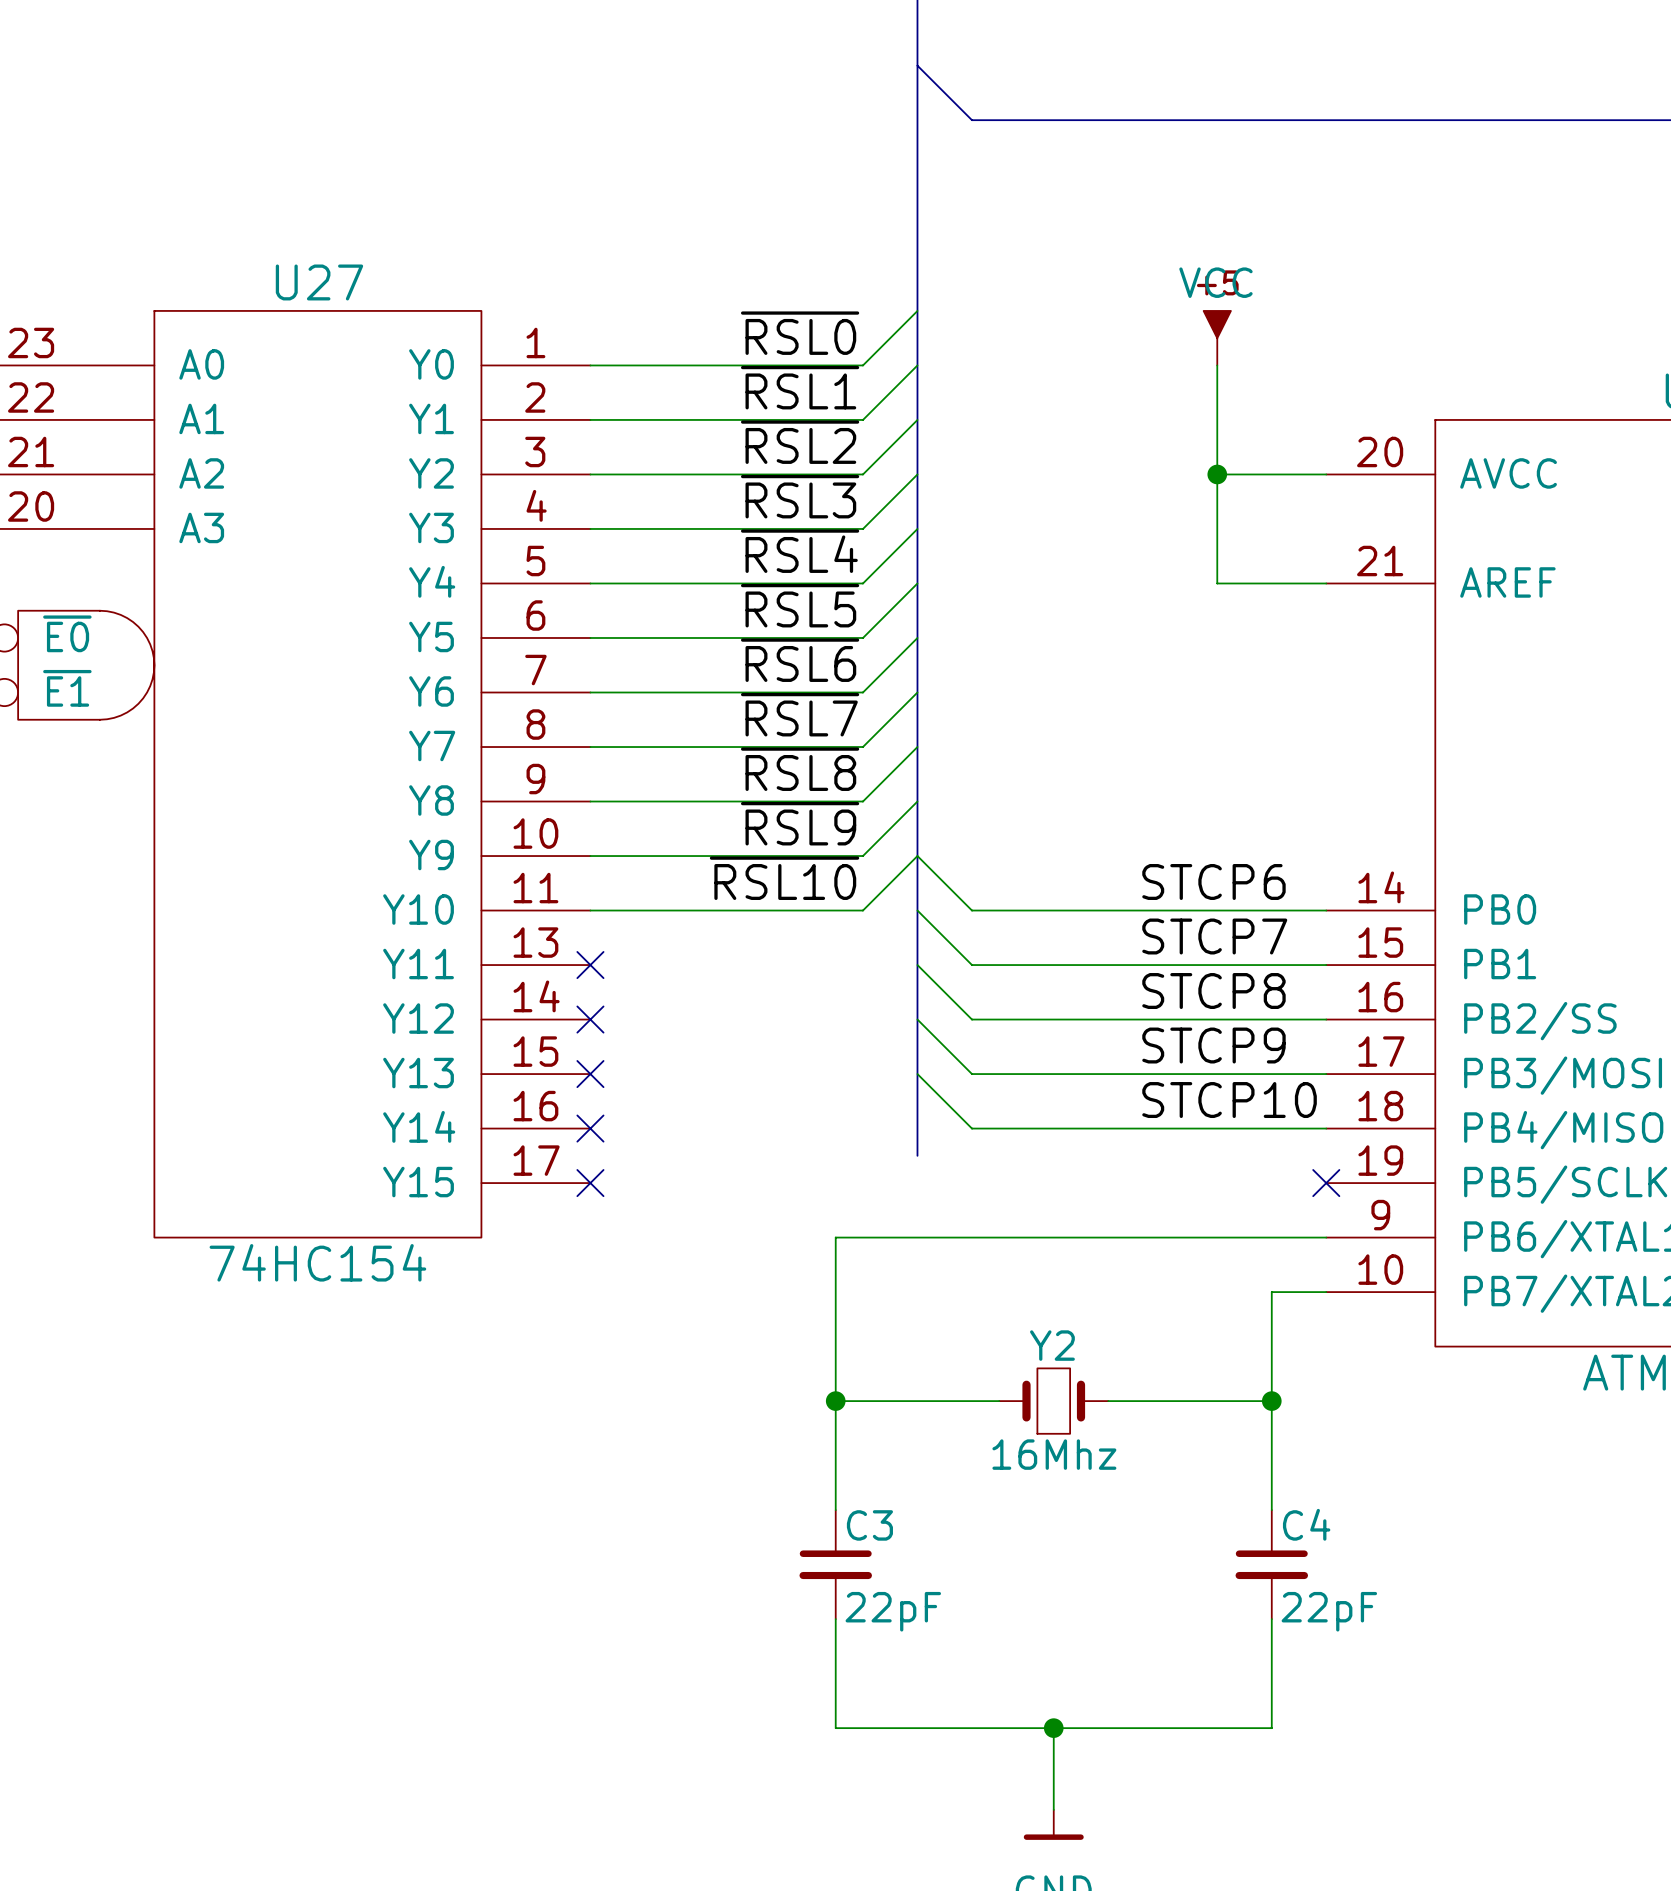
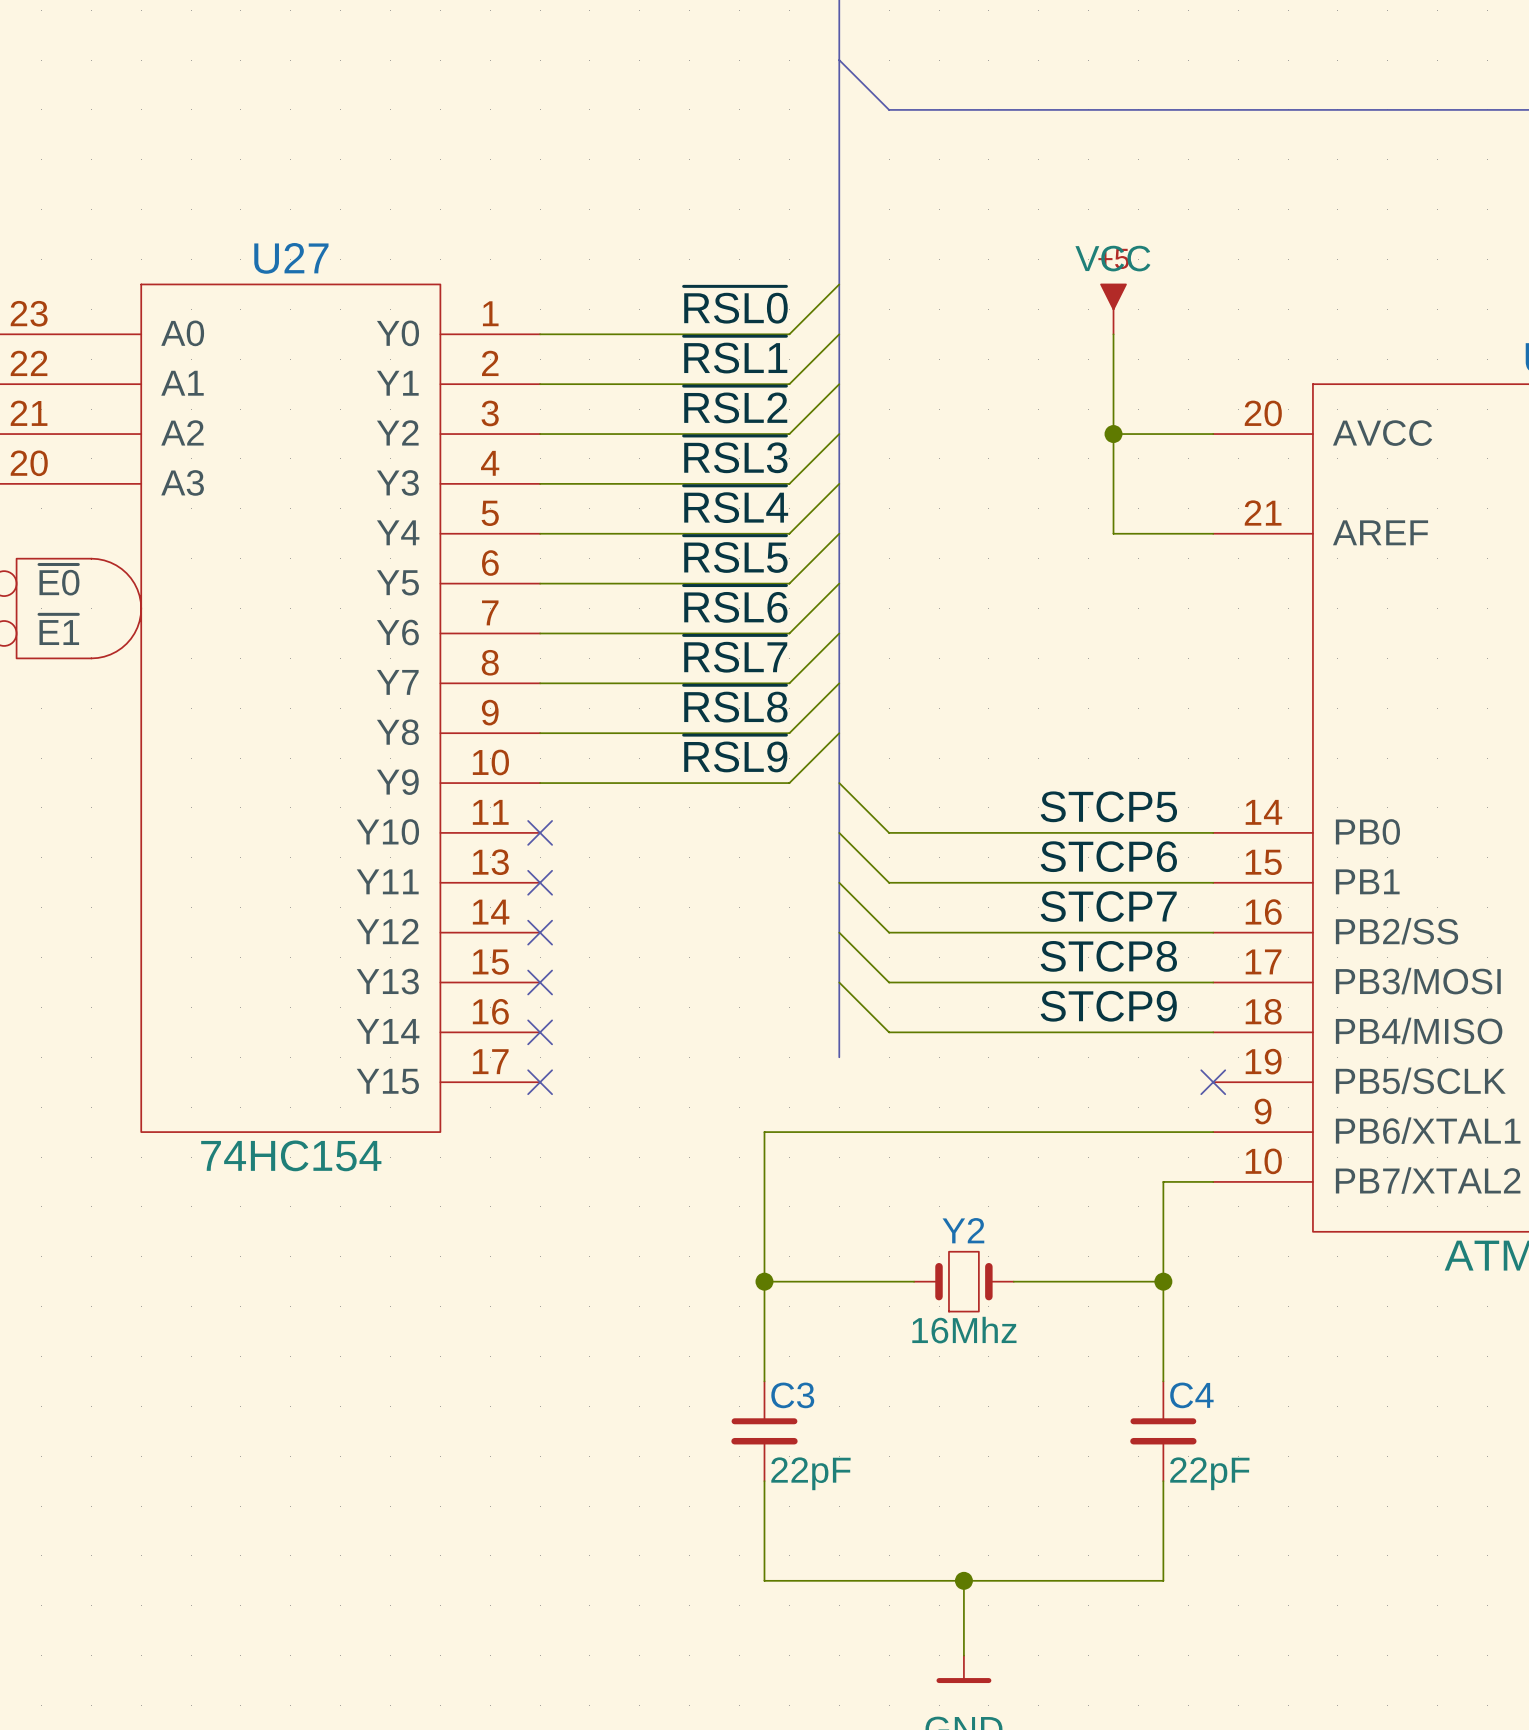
wire: (917, 856) (862, 910) (590, 910) -> none
label: ~{RSL10} (784, 878) -> none
label: STCP6 (1213, 881) -> STCP5 (1108, 806)
no-connect mark: none -> (540, 832)
label: STCP7 (1214, 936) -> STCP6 (1108, 856)
label: STCP8 (1213, 991) -> STCP7 (1108, 906)
label: STCP9 (1213, 1045) -> STCP8 (1108, 956)
label: STCP10 (1229, 1100) -> STCP9 (1108, 1006)

